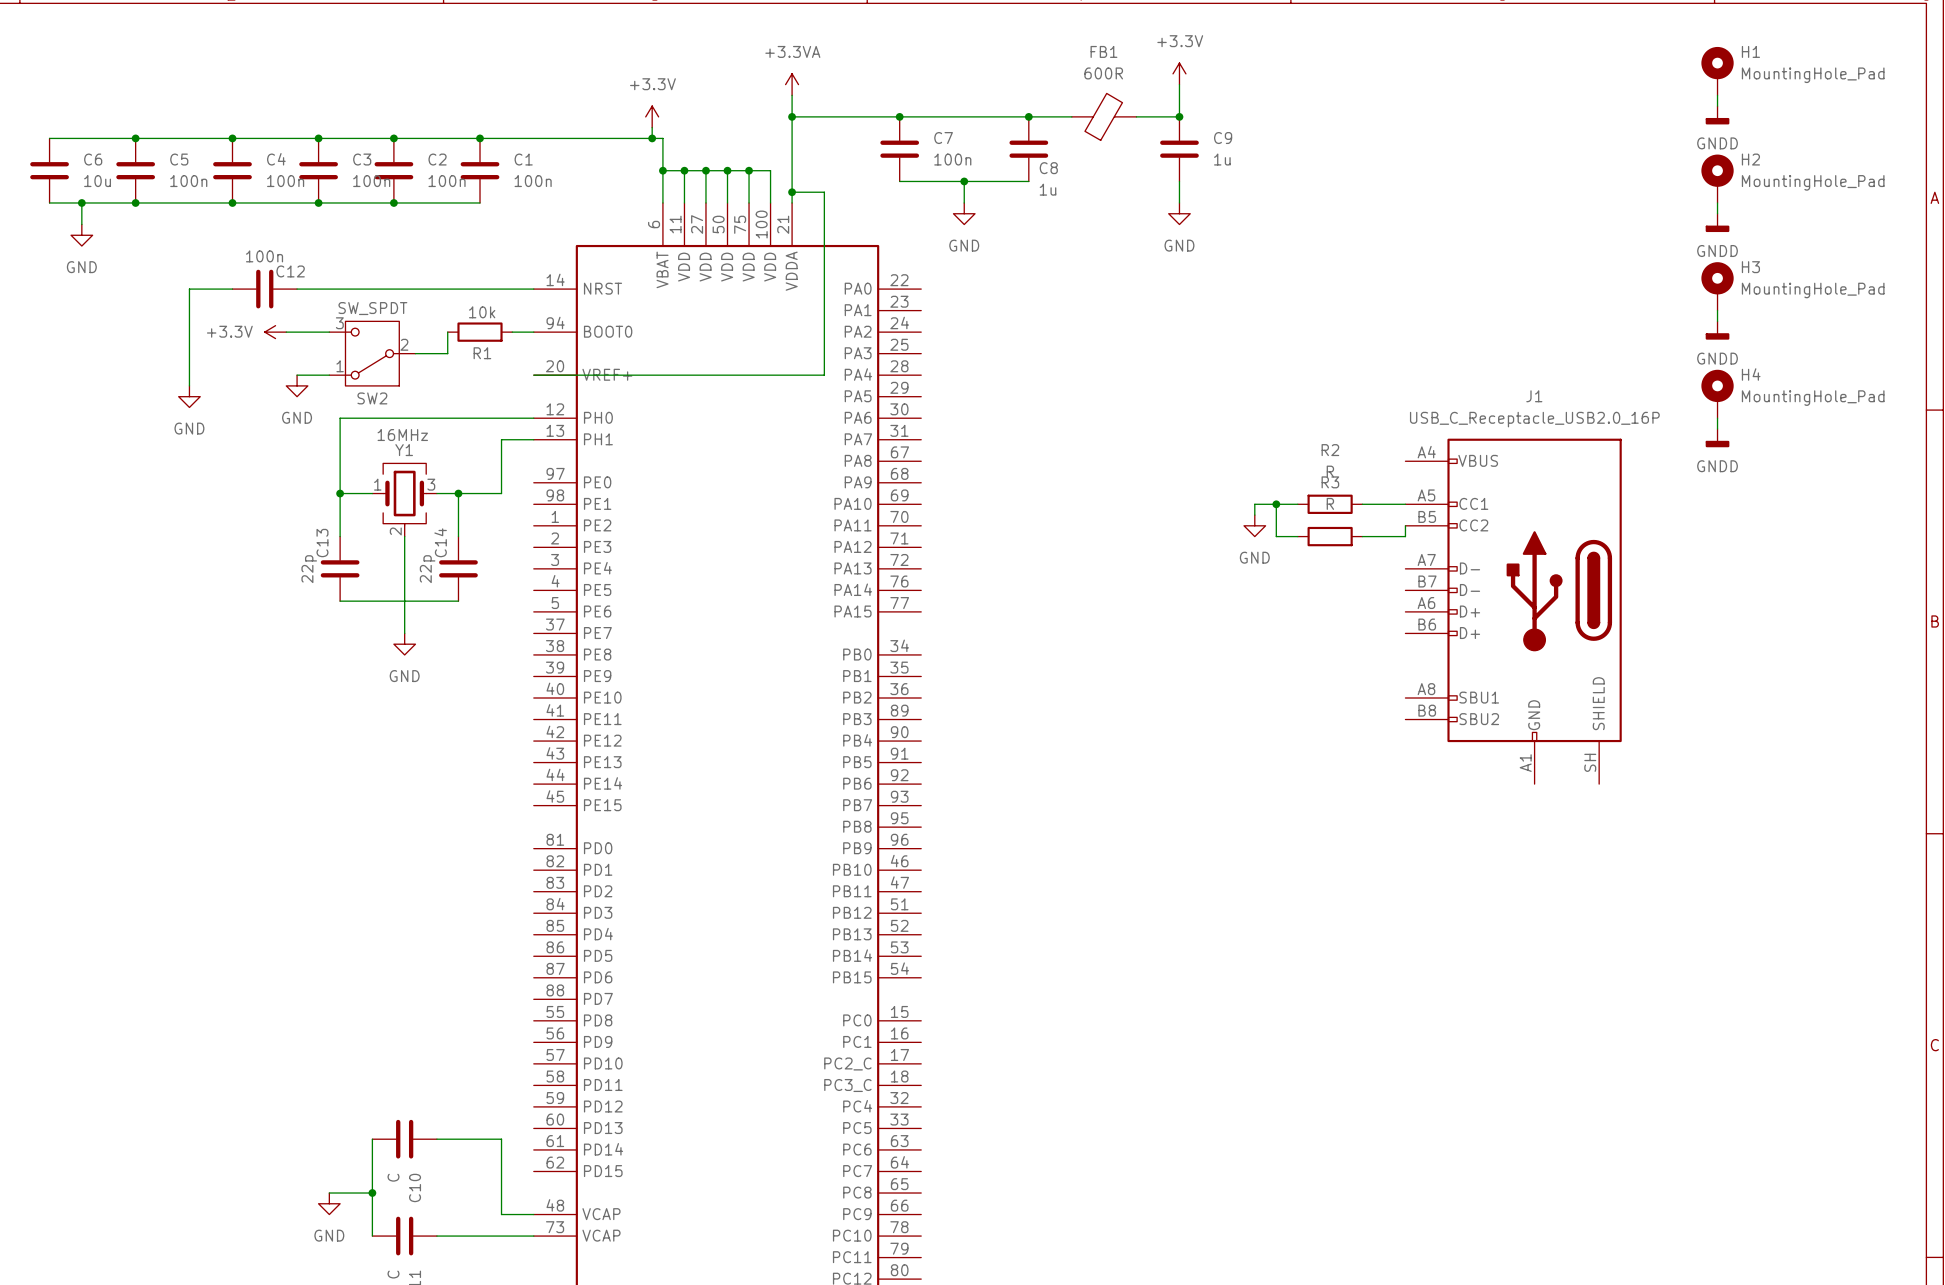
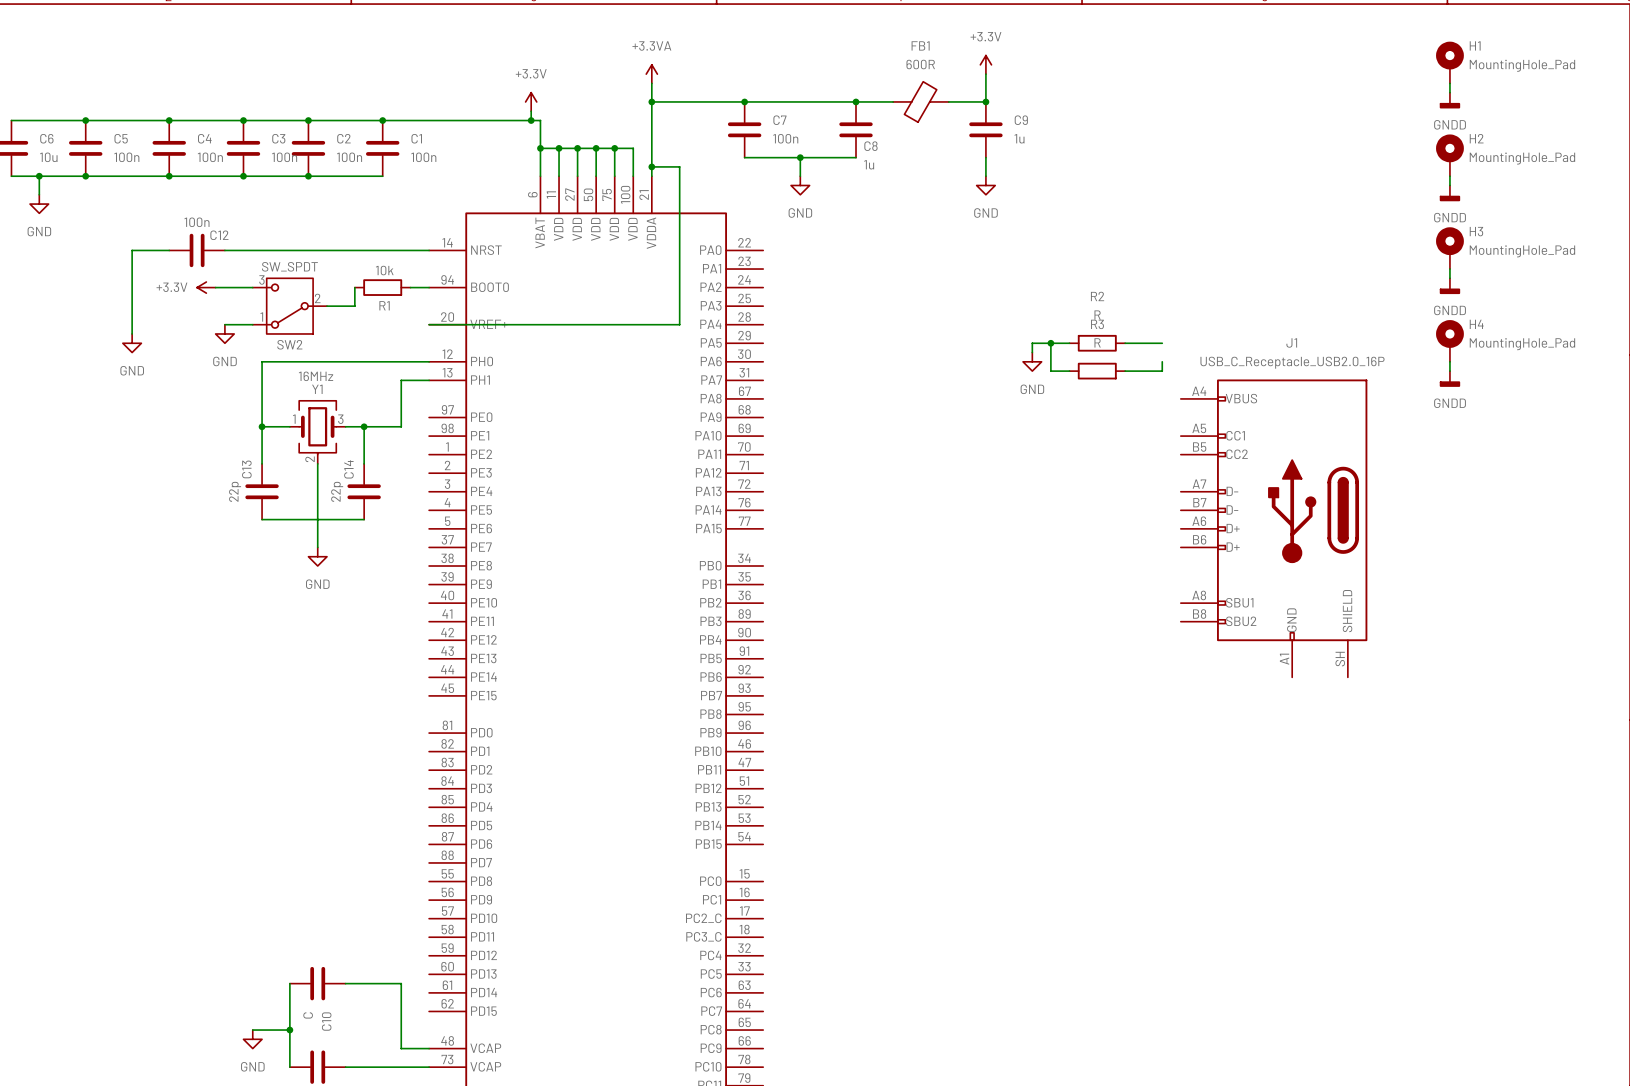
junction: none -> (1050, 343)
wire: (1276, 504) (1276, 536) (1297, 536) -> (1050, 343) (1050, 371) (1069, 371)
junction: (1276, 504) -> none
wire: (1297, 504) (1254, 504) (1254, 515) -> (1069, 343) (1032, 343) (1032, 352)
R2 position: (1330, 504) -> (1097, 343)
wire: (1362, 504) (1405, 504) -> (1125, 343) (1162, 343)
power symbol position: GND (1254, 525) -> GND (1032, 361)
wire: (1405, 525) (1405, 536) (1362, 536) -> (1162, 361) (1162, 371) (1125, 371)
R3 position: (1330, 536) -> (1097, 371)

